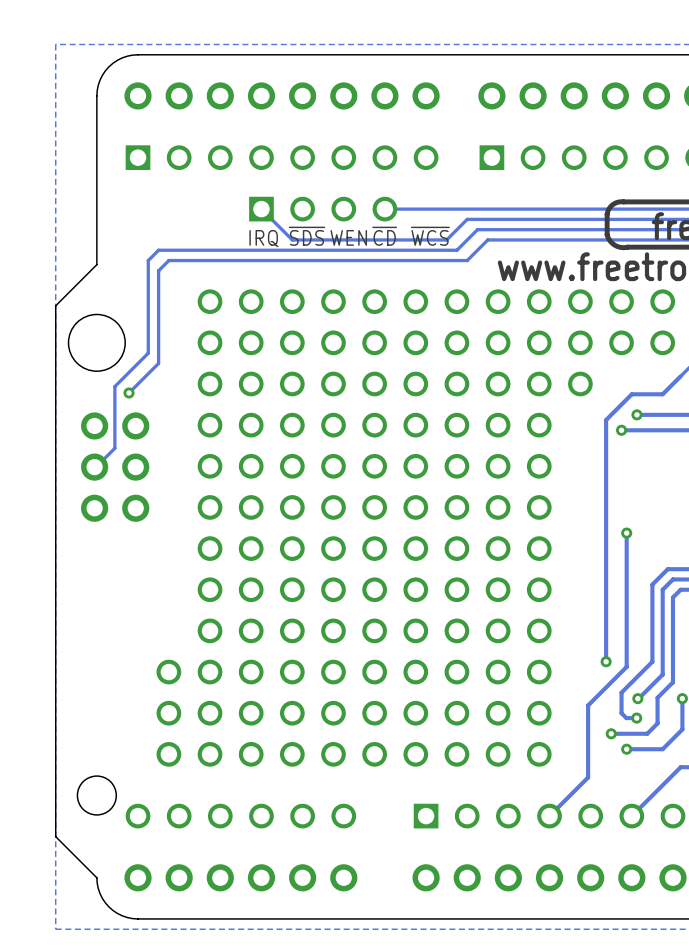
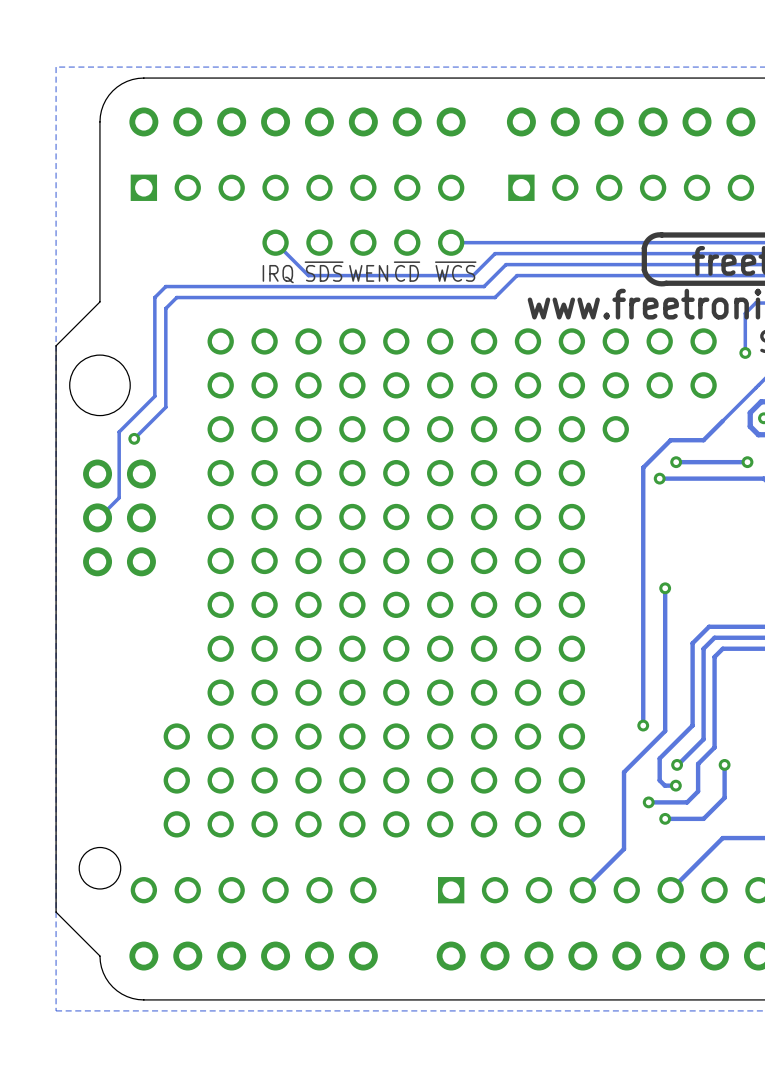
part: (323, 209) -> none
part: none -> (363, 242)
track: (426, 209) (384, 209) -> none

